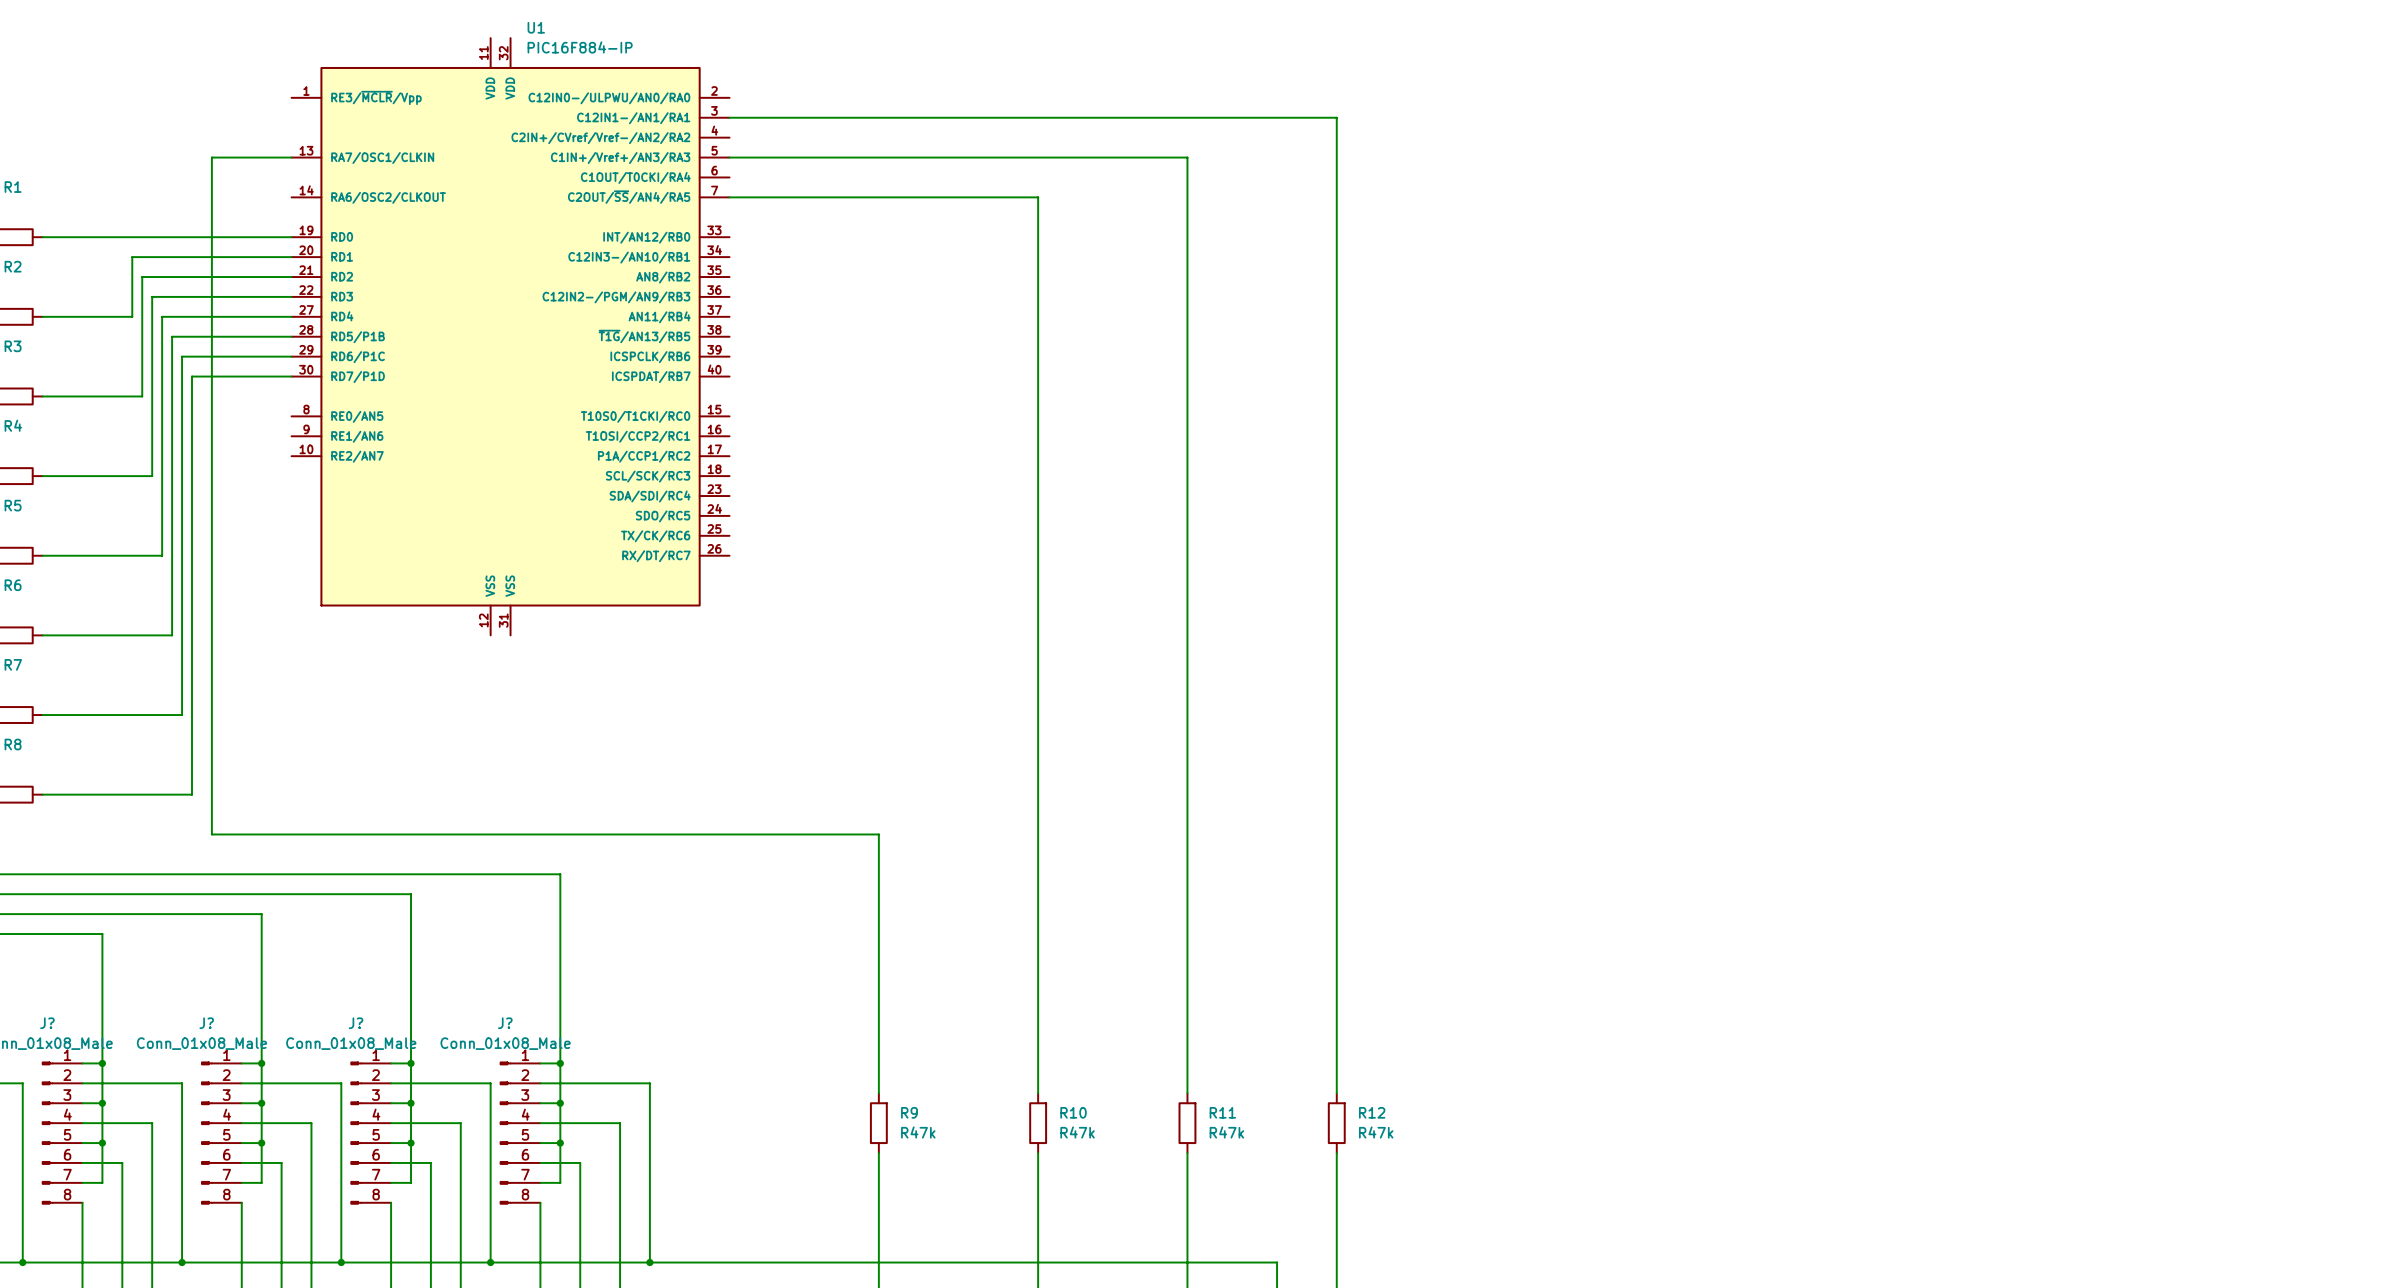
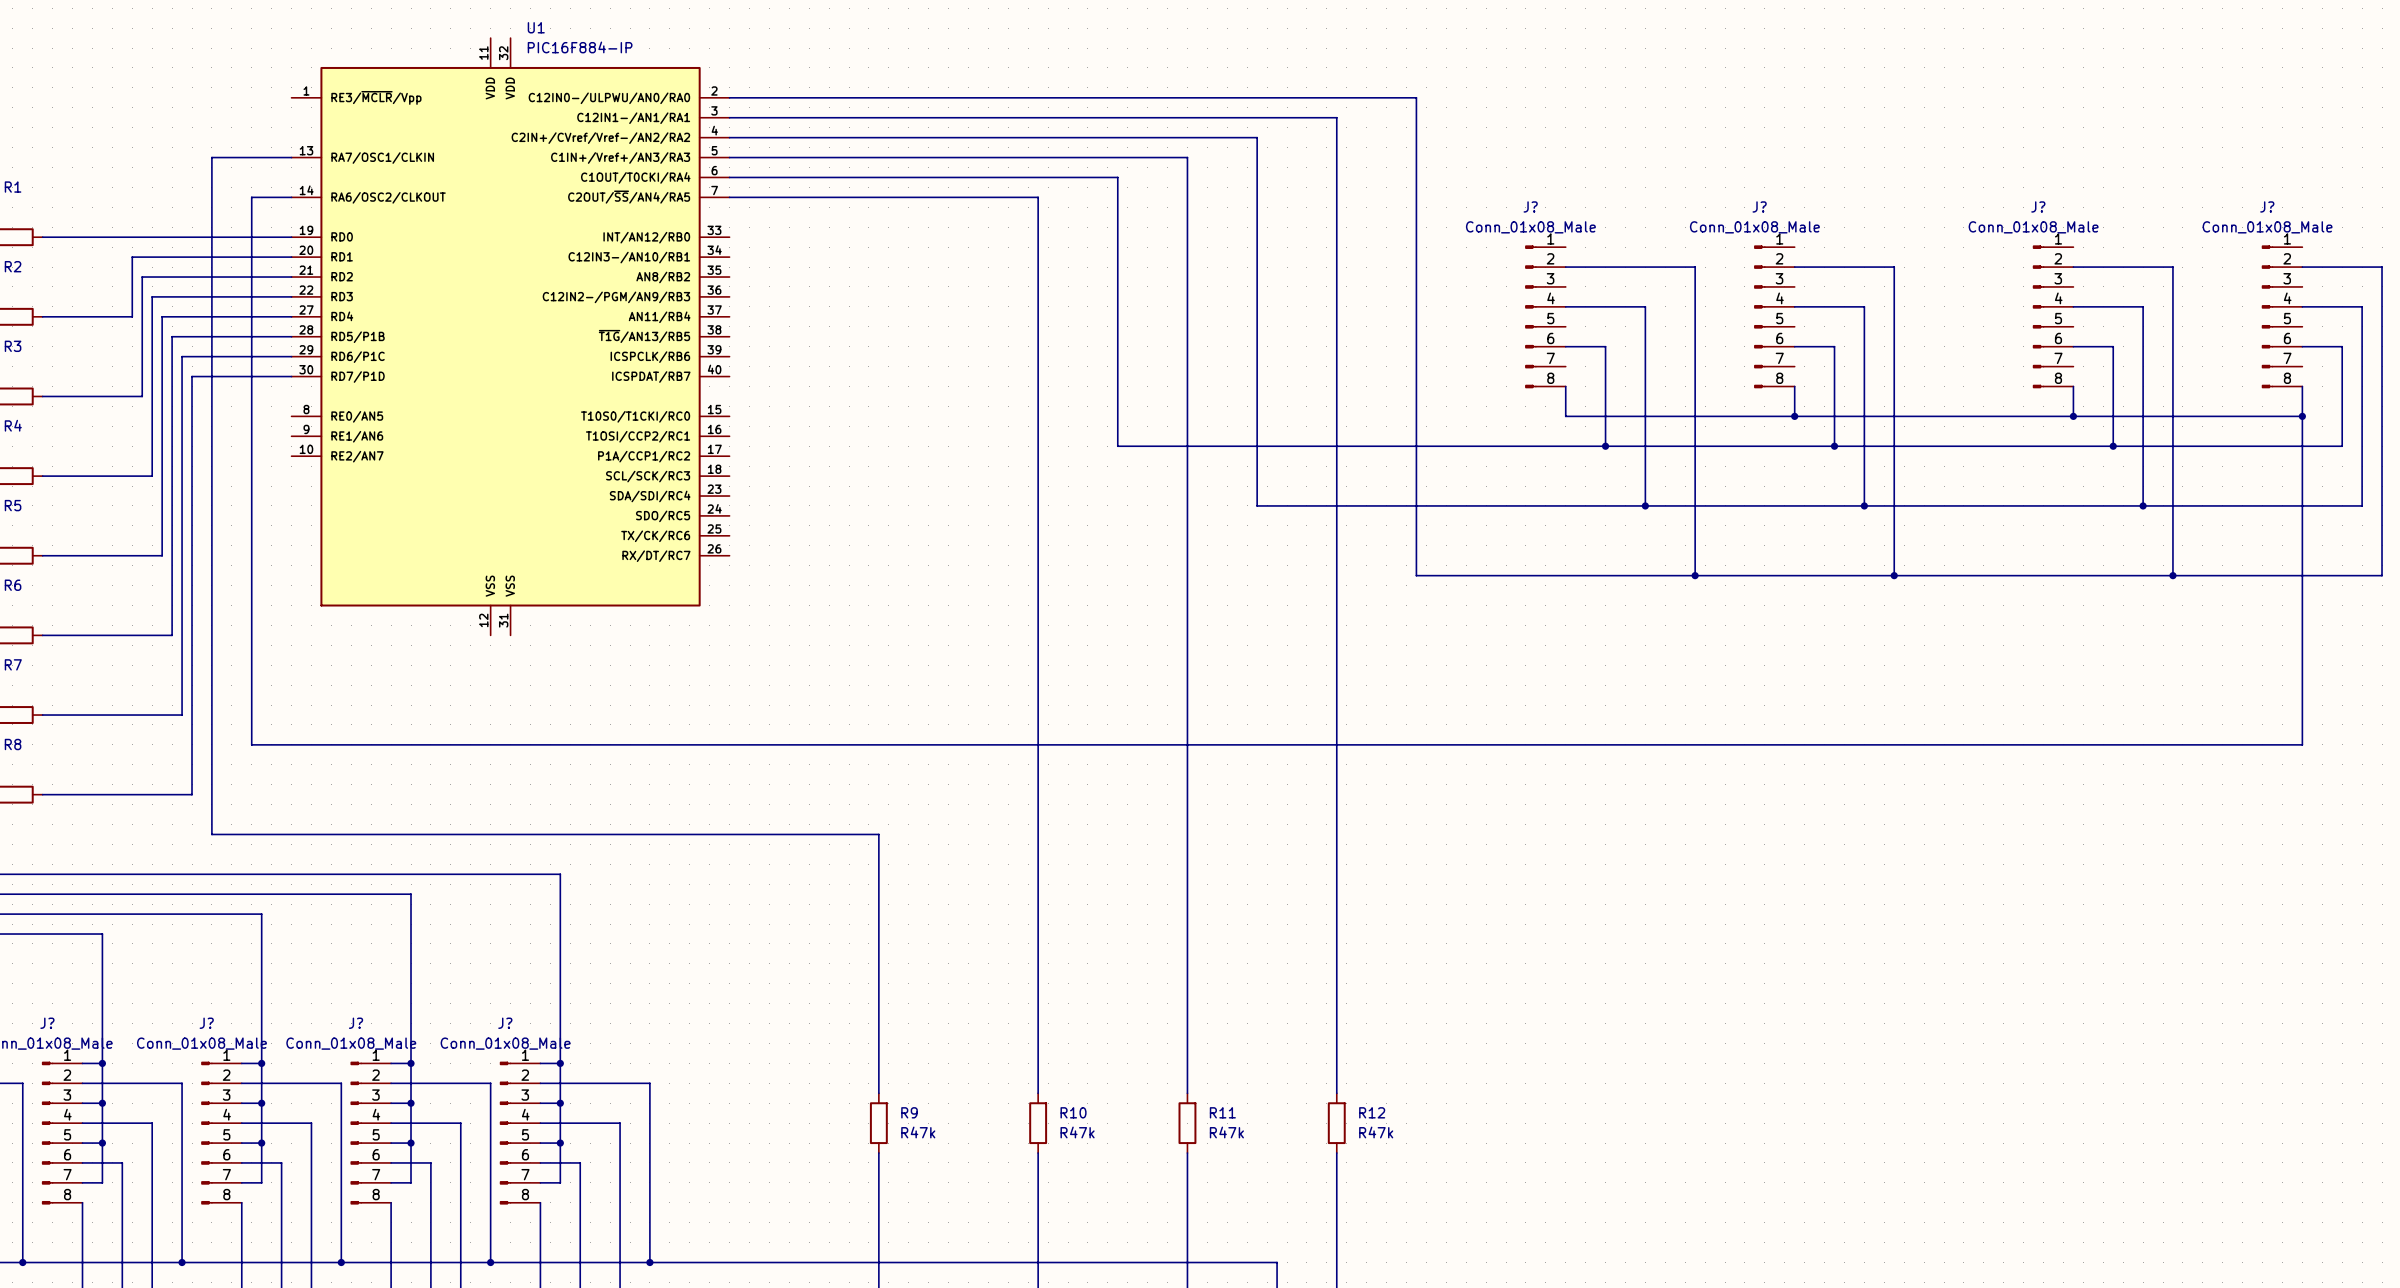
wire: none -> (729, 97) (1416, 97) (1416, 575) (2382, 575) (2382, 267) (2302, 267)
wire: none -> (729, 137) (1257, 137) (1257, 505) (2362, 505) (2362, 306) (2302, 306)
wire: none -> (729, 177) (1117, 177) (1117, 446) (2342, 446) (2342, 346) (2302, 346)
wire: none -> (291, 197) (251, 197) (251, 744) (2302, 744) (2302, 386)
wire: none -> (1565, 267) (1695, 267) (1695, 575)
wire: none -> (1794, 267) (1894, 267) (1894, 575)
wire: none -> (2073, 267) (2172, 267) (2172, 575)
wire: none -> (1565, 306) (1645, 306) (1645, 505)
wire: none -> (1794, 306) (1864, 306) (1864, 505)
wire: none -> (2073, 306) (2143, 306) (2143, 505)
J?: none -> Conn_01x08_Male (1545, 316)
J?: none -> Conn_01x08_Male (1774, 316)
J?: none -> Conn_01x08_Male (2053, 316)
J?: none -> Conn_01x08_Male (2282, 316)
wire: none -> (1565, 346) (1605, 346) (1605, 446)
wire: none -> (1794, 346) (1834, 346) (1834, 446)
wire: none -> (2073, 346) (2113, 346) (2113, 446)
wire: none -> (1565, 386) (1565, 416) (2302, 416)
wire: none -> (1794, 386) (1794, 416)
wire: none -> (2073, 386) (2073, 416)
junction: none -> (1794, 416)
junction: none -> (2073, 416)
junction: none -> (2302, 416)
junction: none -> (1605, 446)
junction: none -> (1834, 446)
junction: none -> (2113, 446)
junction: none -> (1645, 505)
junction: none -> (1864, 505)
junction: none -> (2143, 505)
junction: none -> (1695, 575)
junction: none -> (1894, 575)
junction: none -> (2172, 575)

